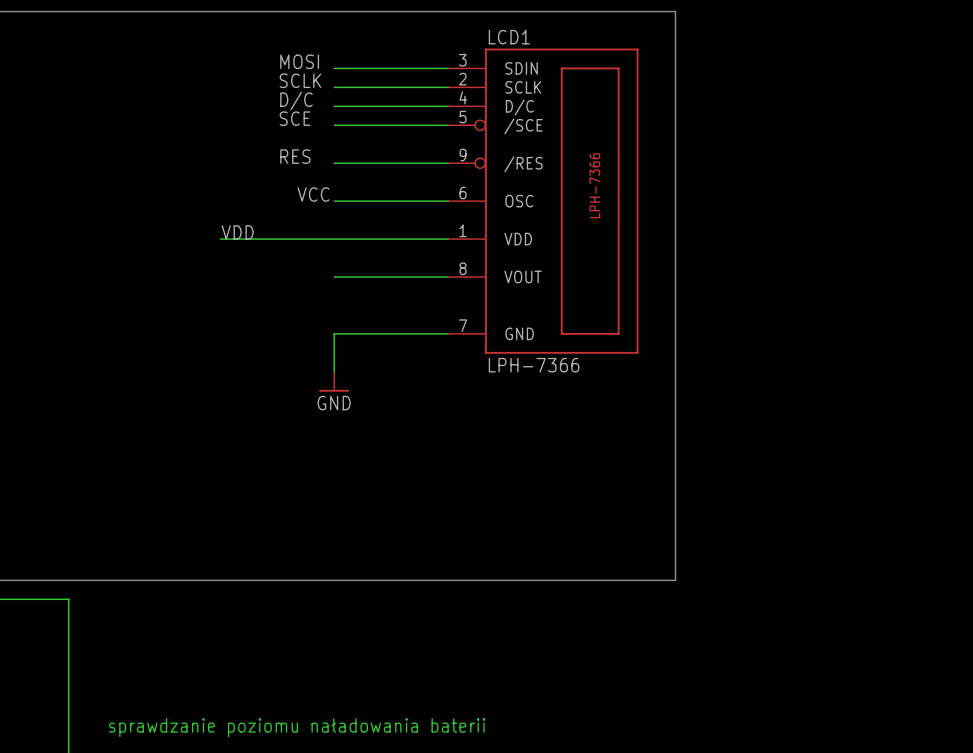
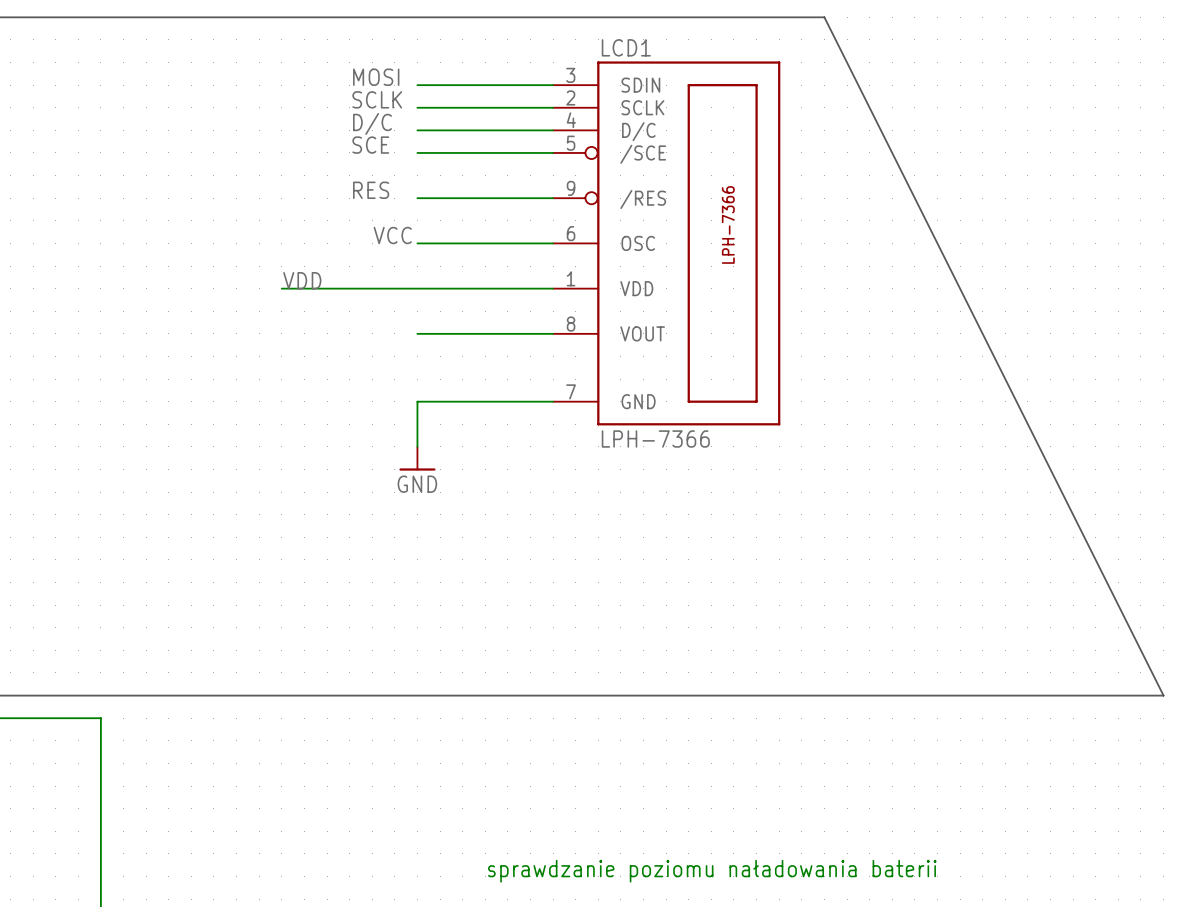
bus: (675, 11) (675, 580) -> (824, 17) (1163, 695) (824, 695)
text: sprawdzanie poziomu naładowania baterii (297, 727) -> none
text: none -> sprawdzanie poziomu naładowania baterii (712, 871)

